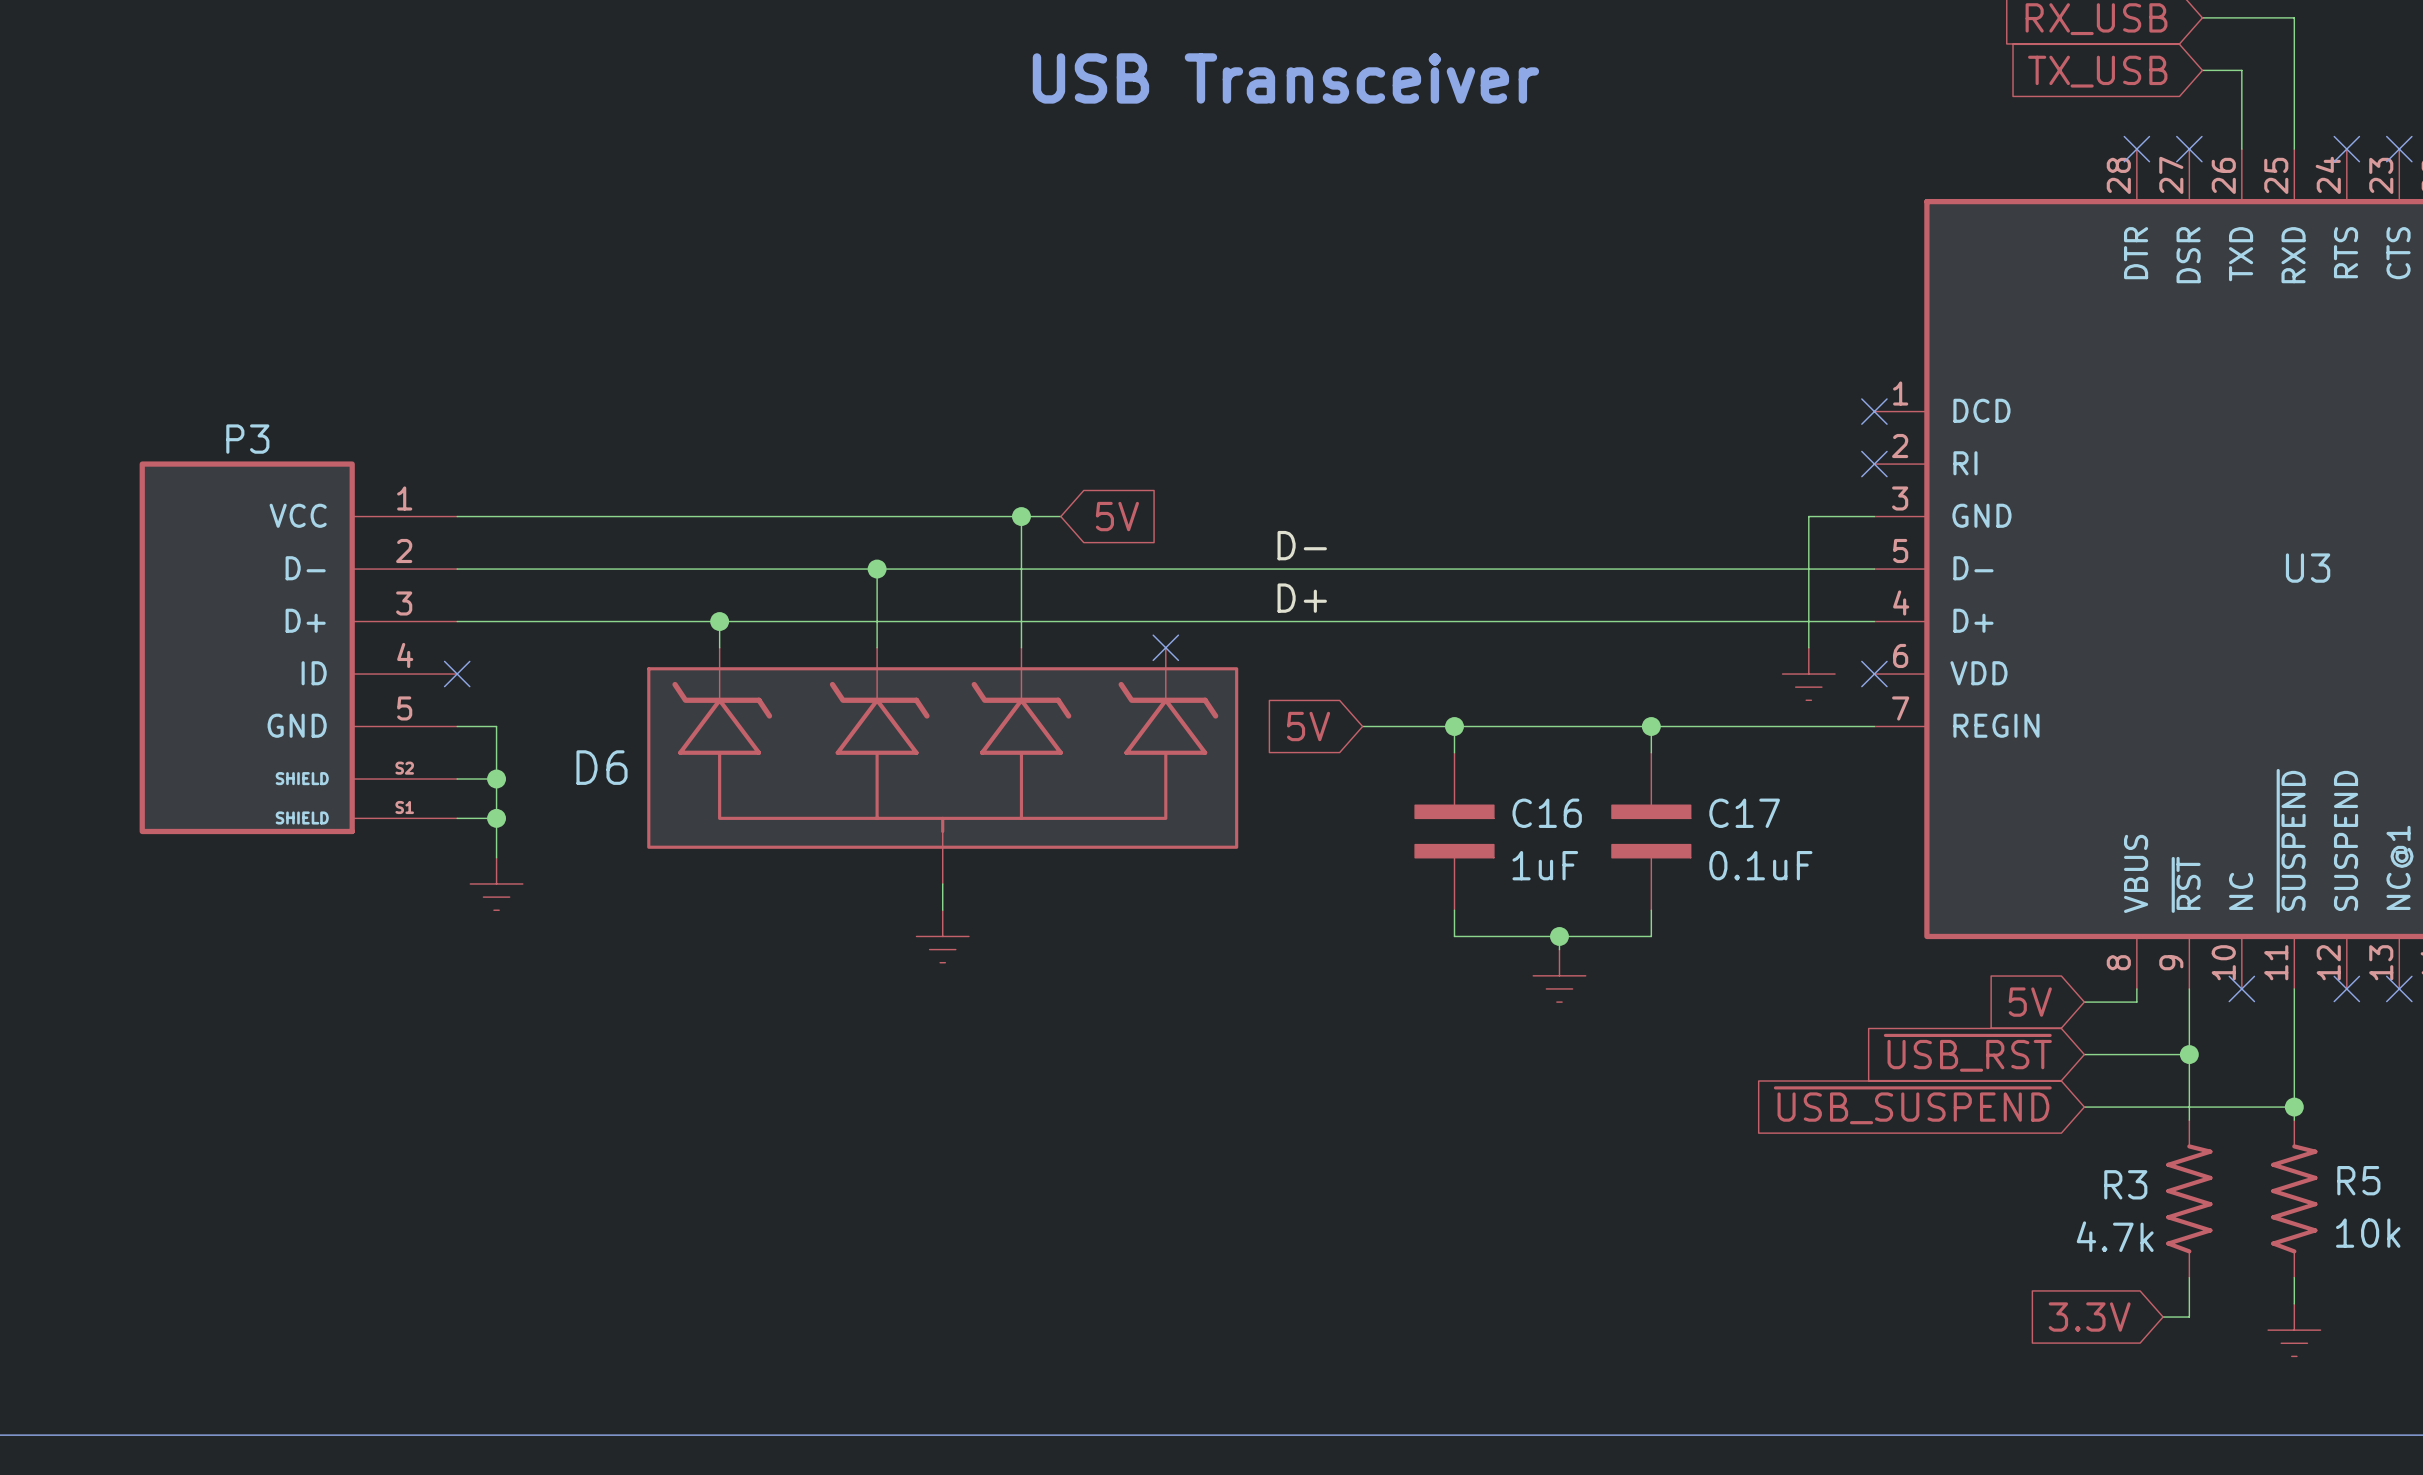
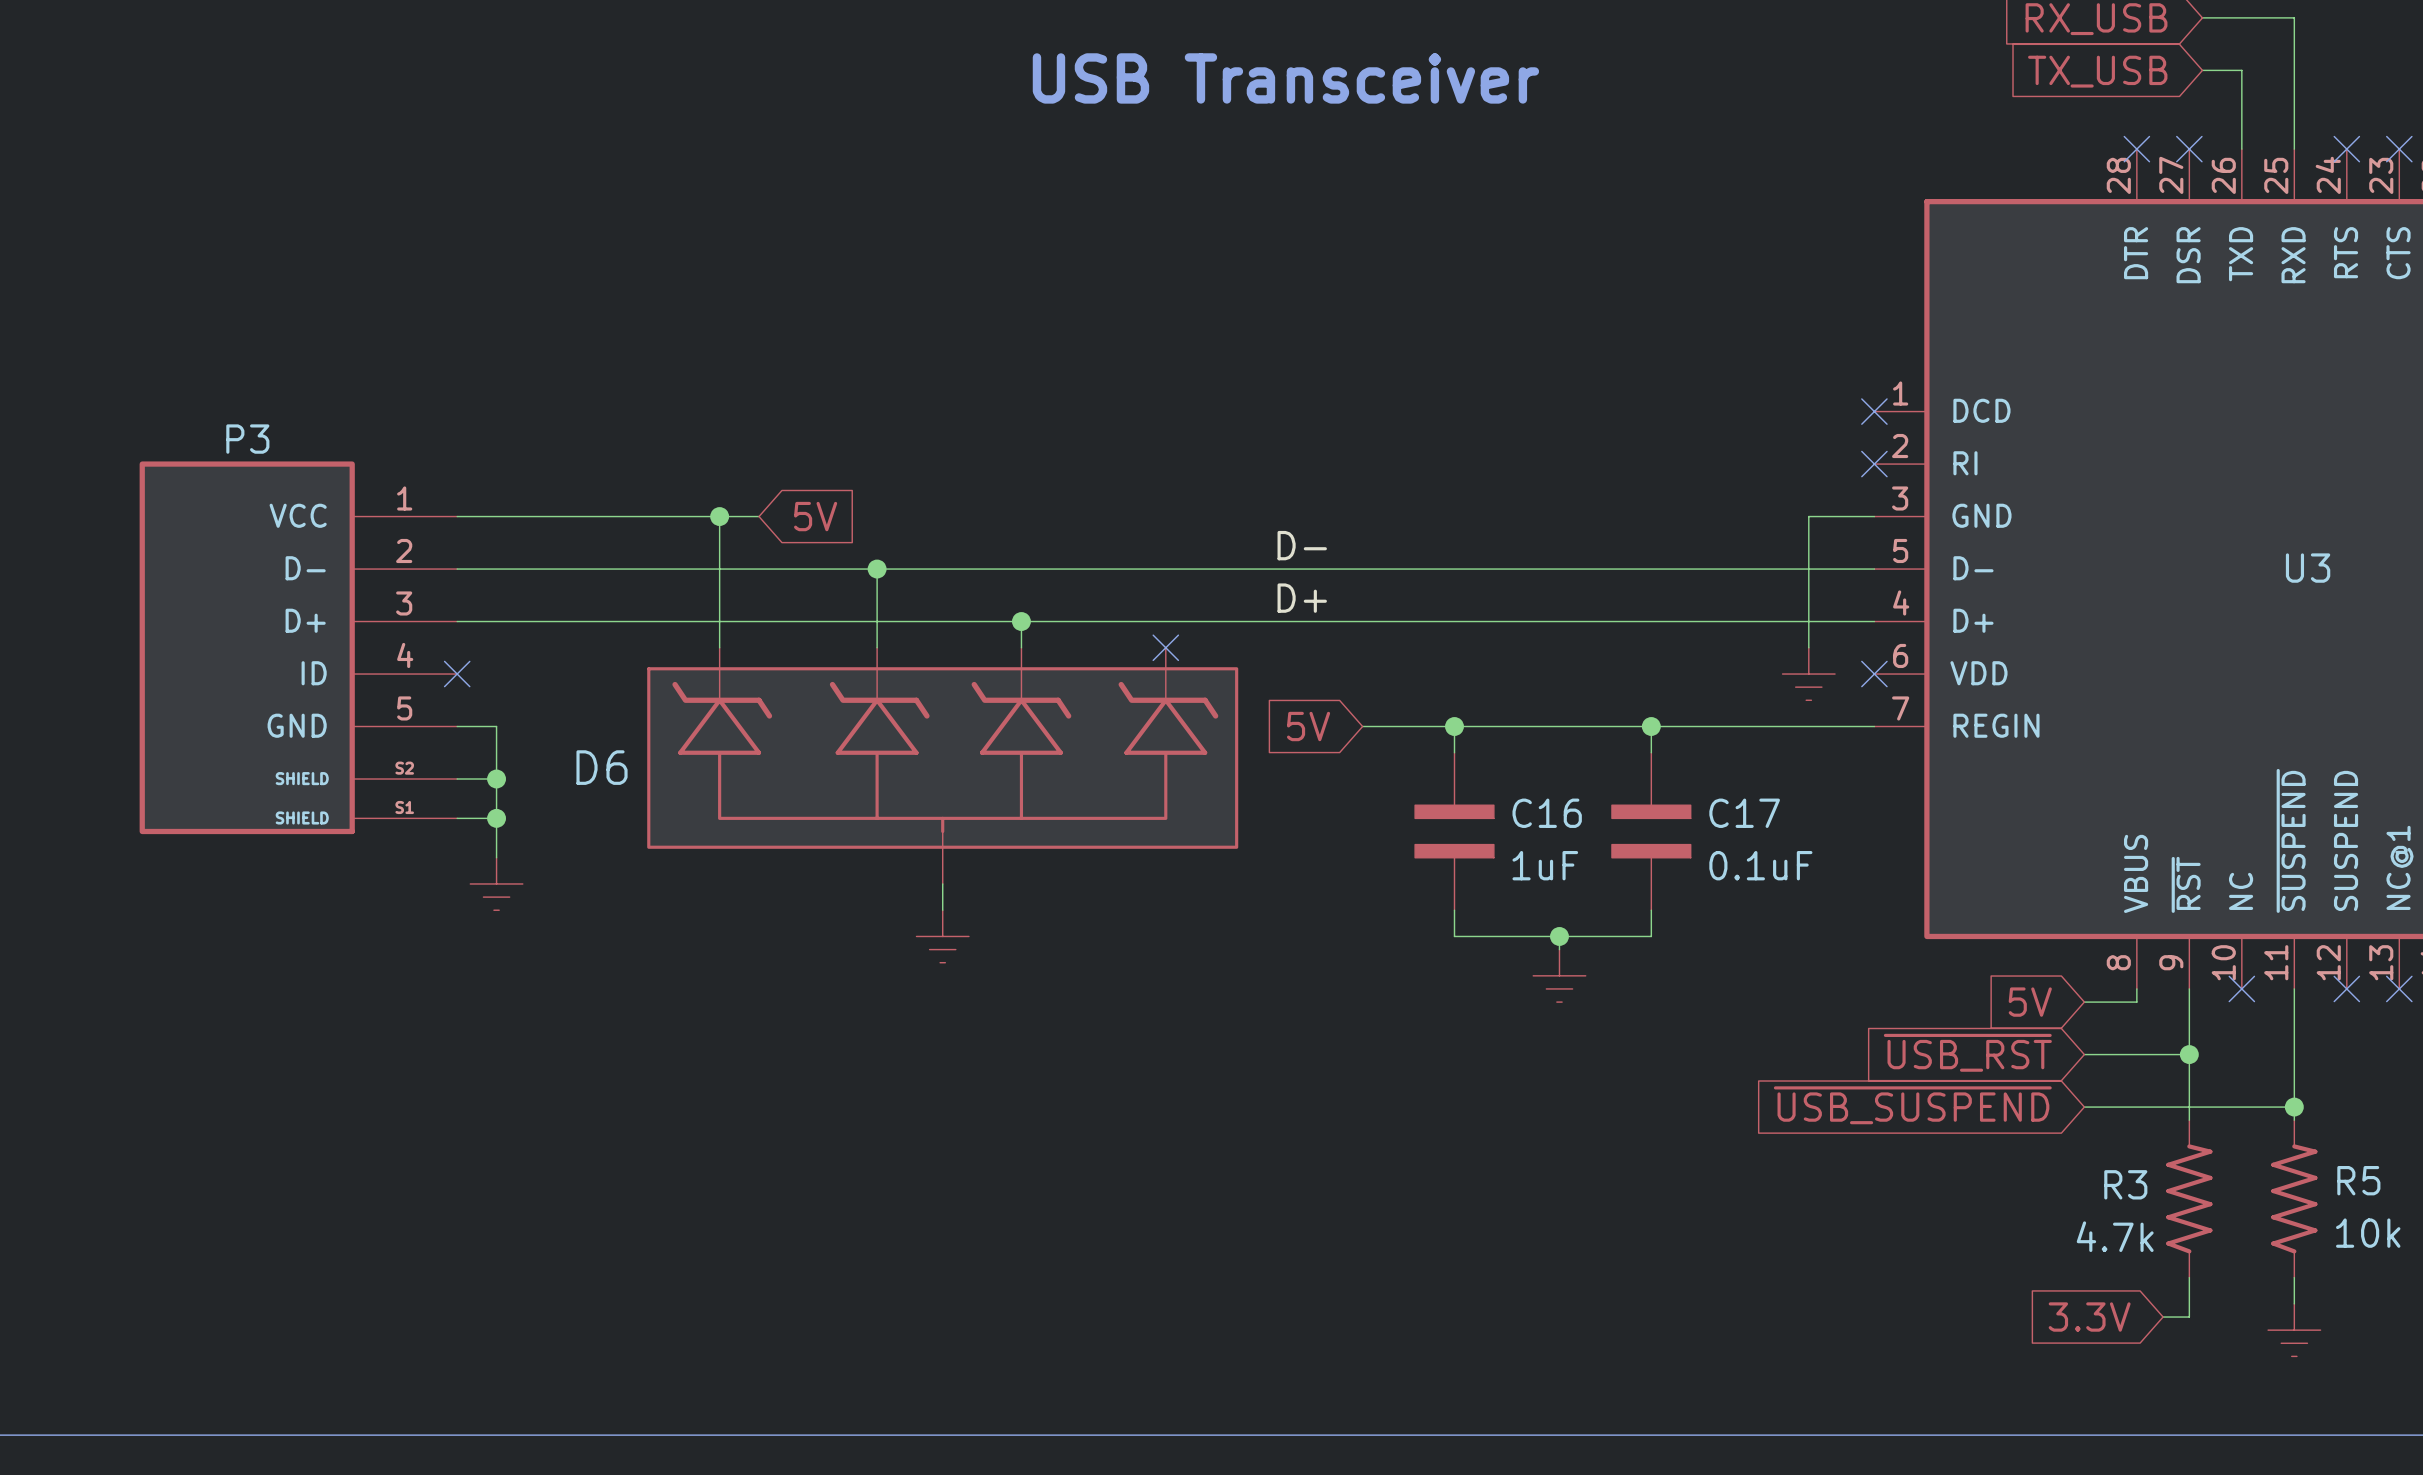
wire: (759, 516) (1060, 516) -> none
wire: (1021, 516) (1021, 621) -> (719, 516) (719, 621)
junction position: (1021, 516) -> (1021, 621)
global label position: 5V (1117, 516) -> 5V (815, 516)
junction position: (719, 621) -> (719, 516)

